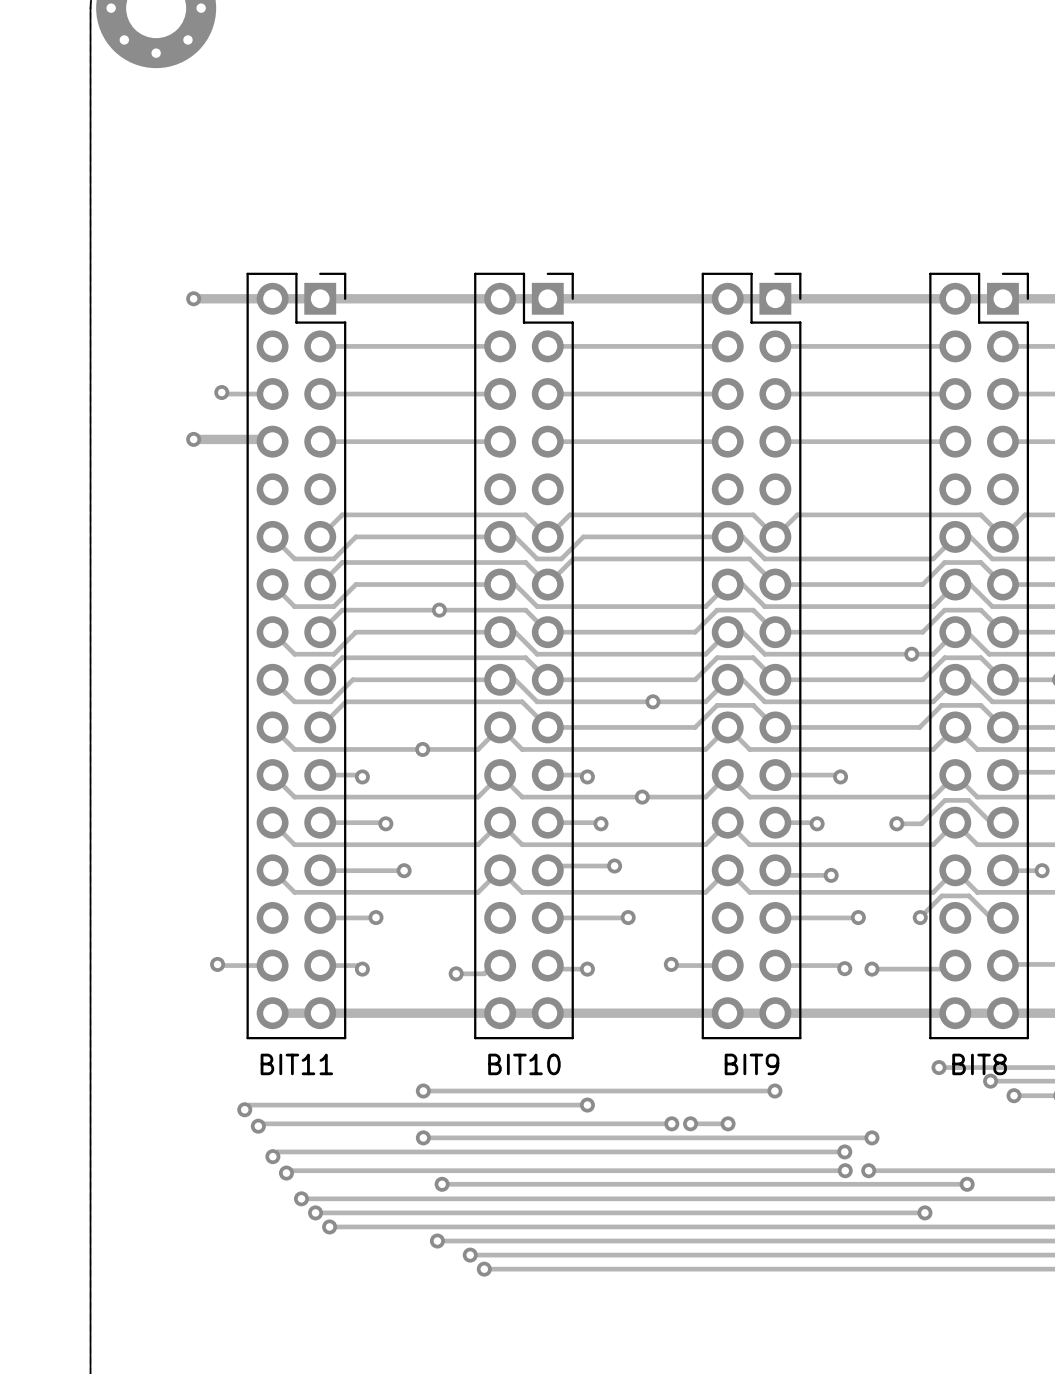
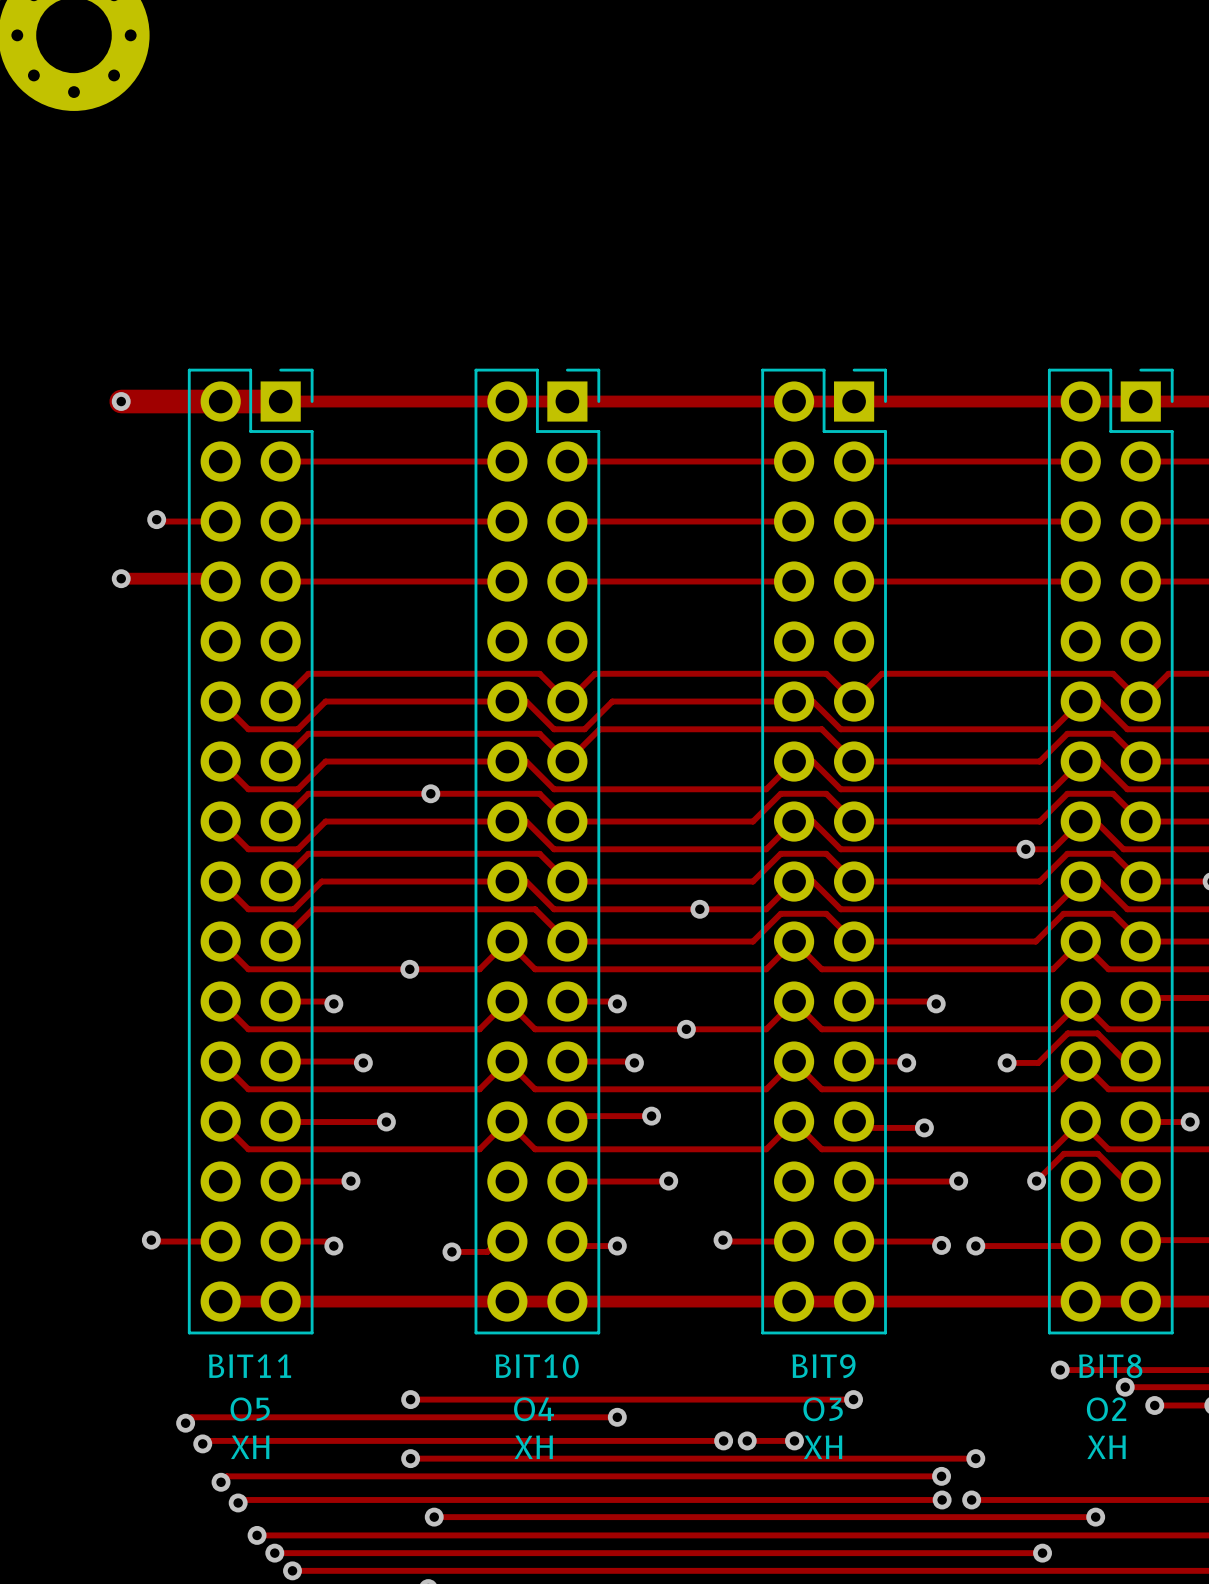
track width: thin (193, 298) (320, 298) -> thick (121, 401) (280, 401)
text: none -> O5 (250, 1409)
text: none -> O4 (534, 1409)
text: none -> O3 (823, 1409)
text: none -> O2 (1106, 1409)
text: none -> XH (250, 1447)
text: none -> XH (533, 1447)
text: none -> XH (823, 1447)
text: none -> XH (1106, 1447)

